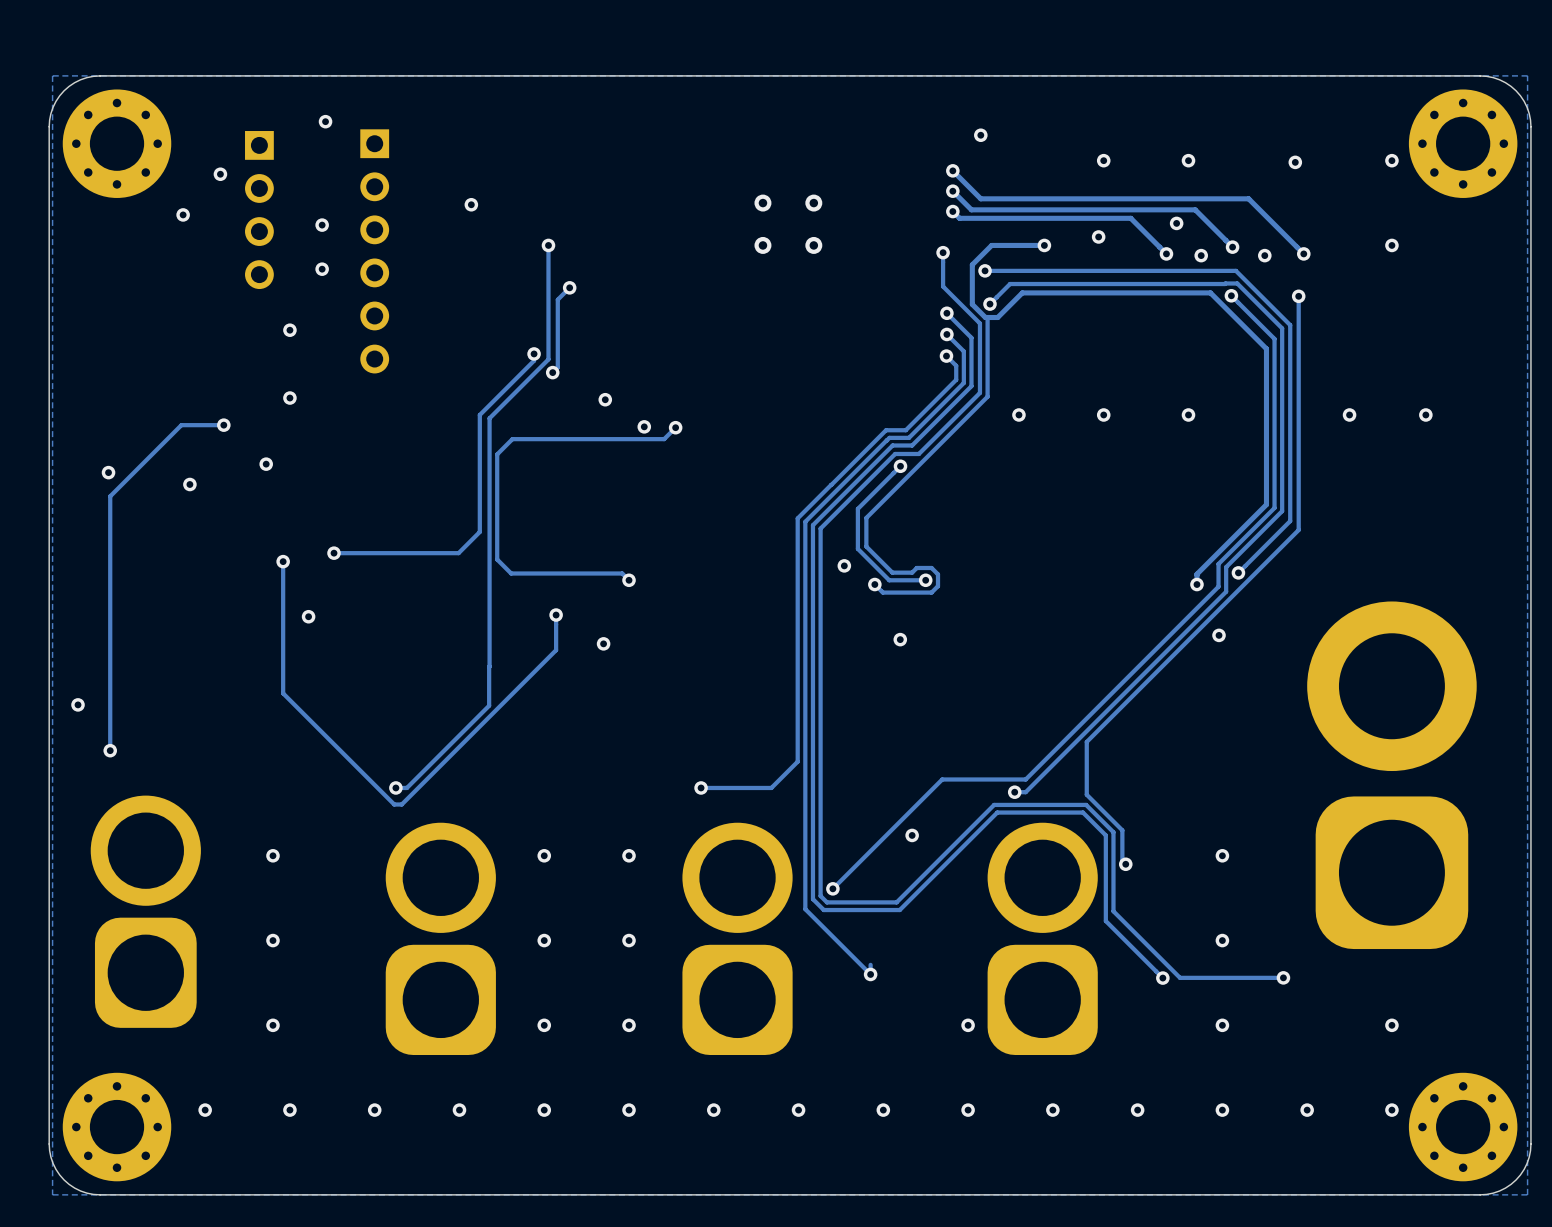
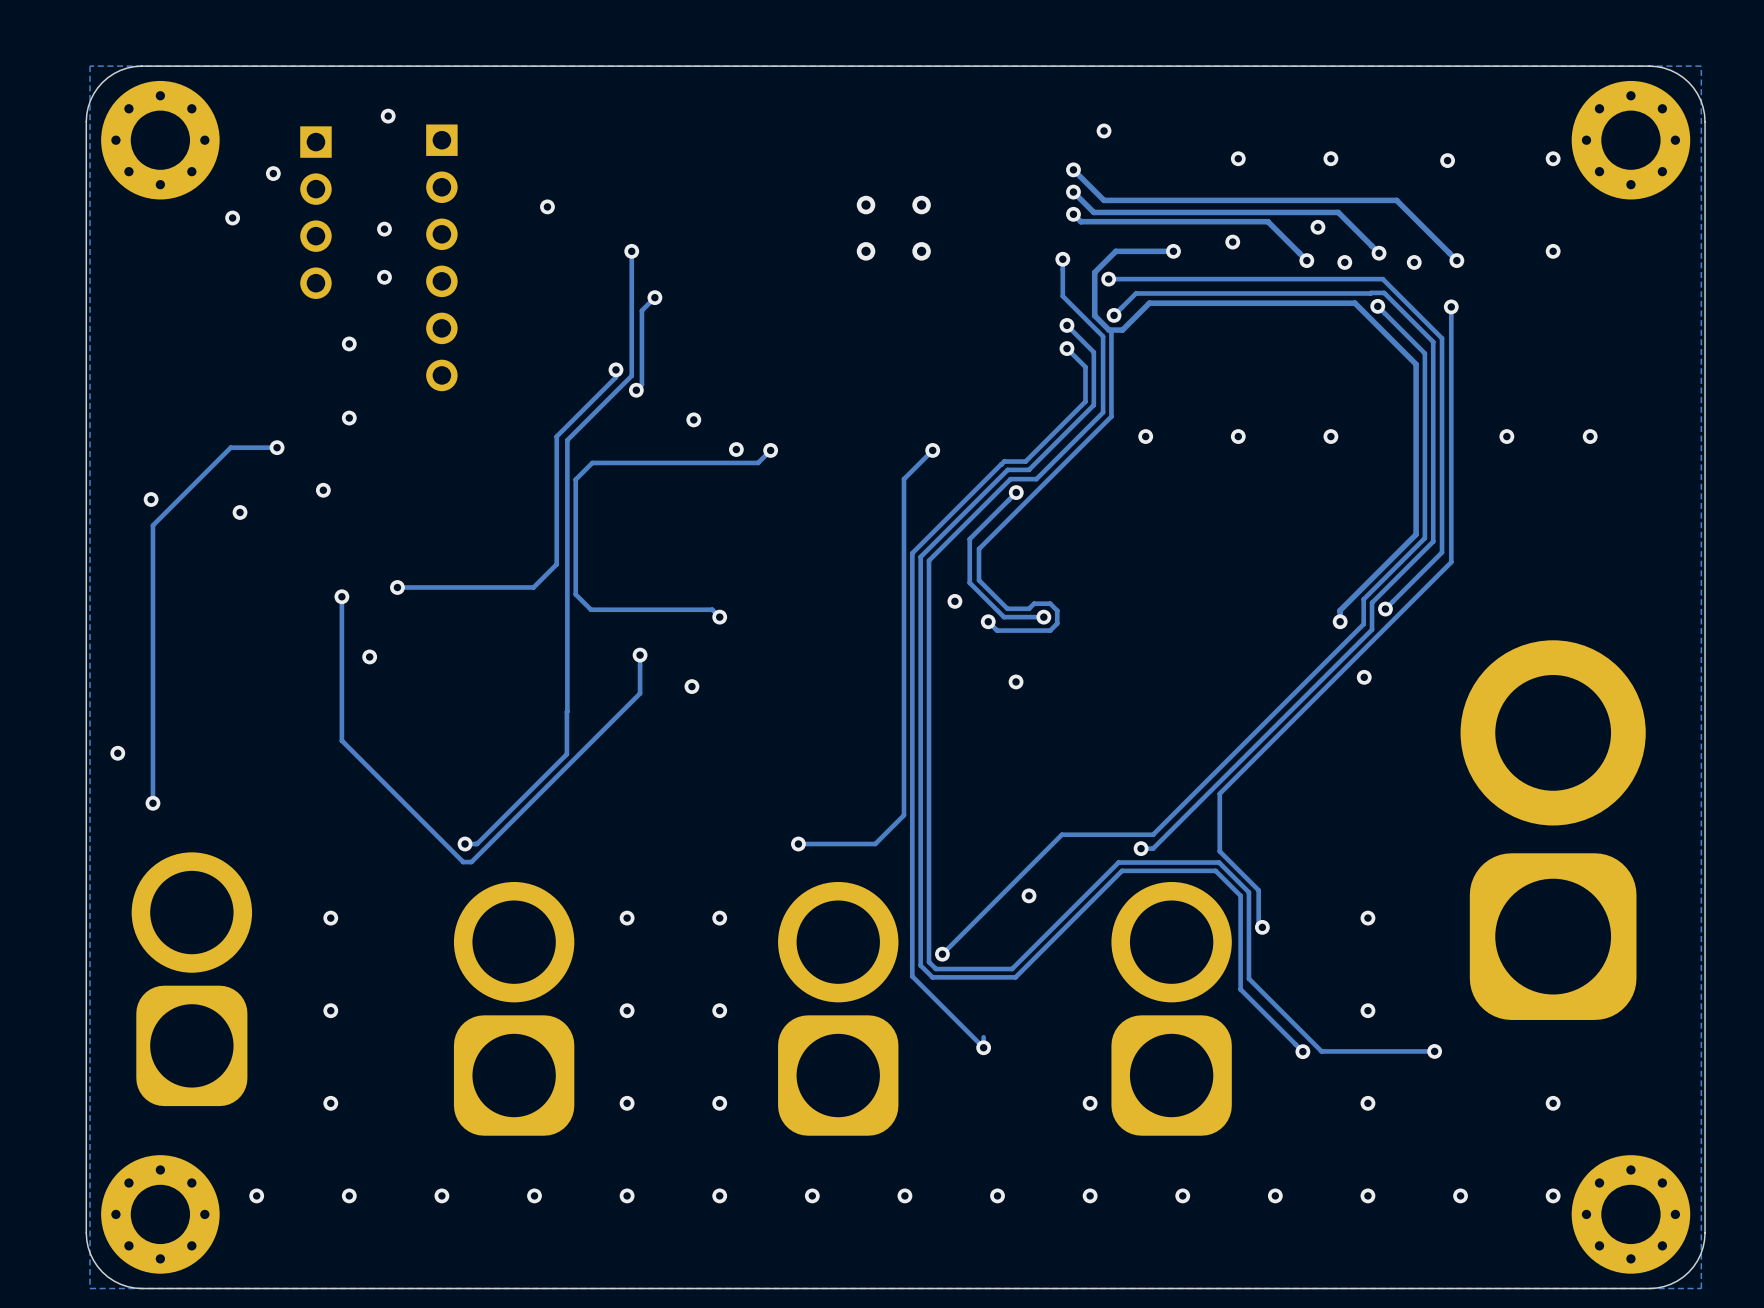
track: (946, 356) (956, 365) (956, 379) (905, 430) (886, 430) (831, 484) -> none
via: (946, 356) -> none
via: none -> (932, 450)
track: (831, 484) (797, 518) -> (932, 450) (904, 479) (904, 549)

